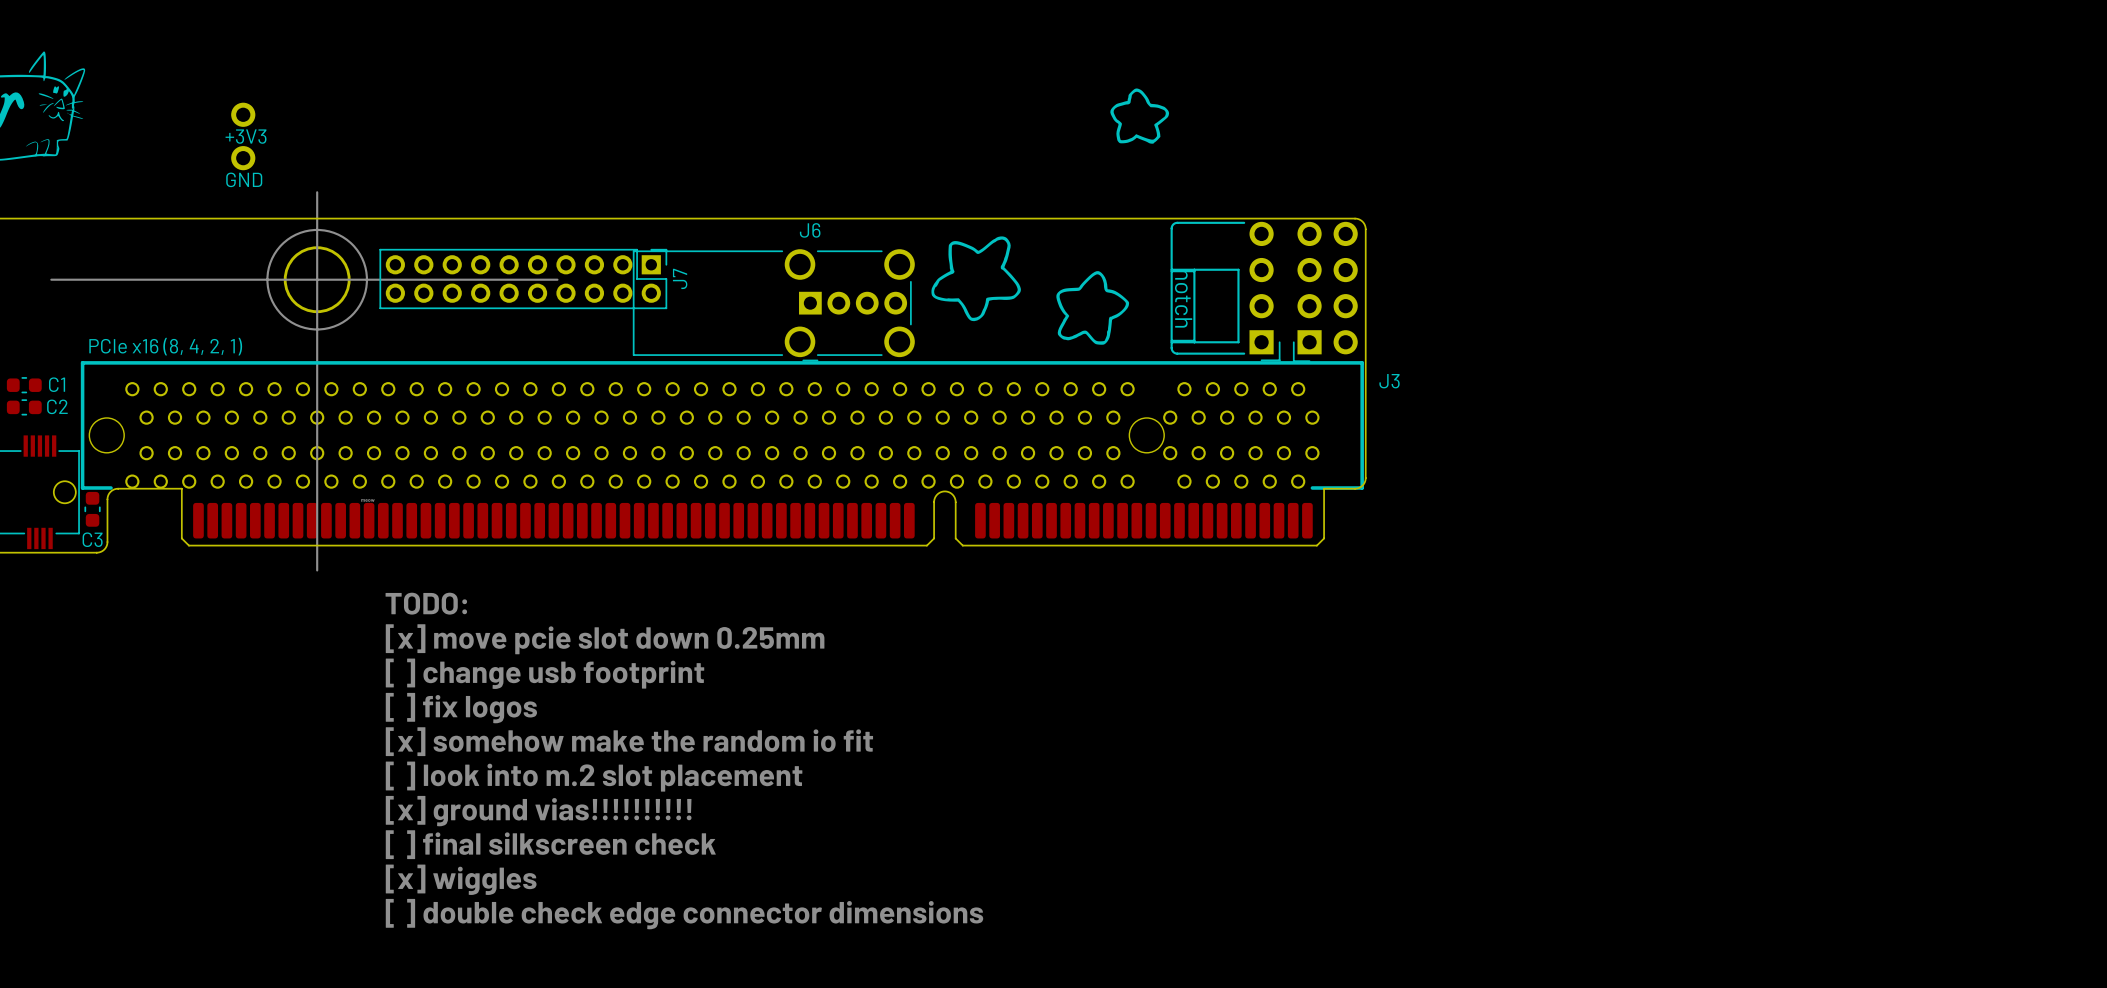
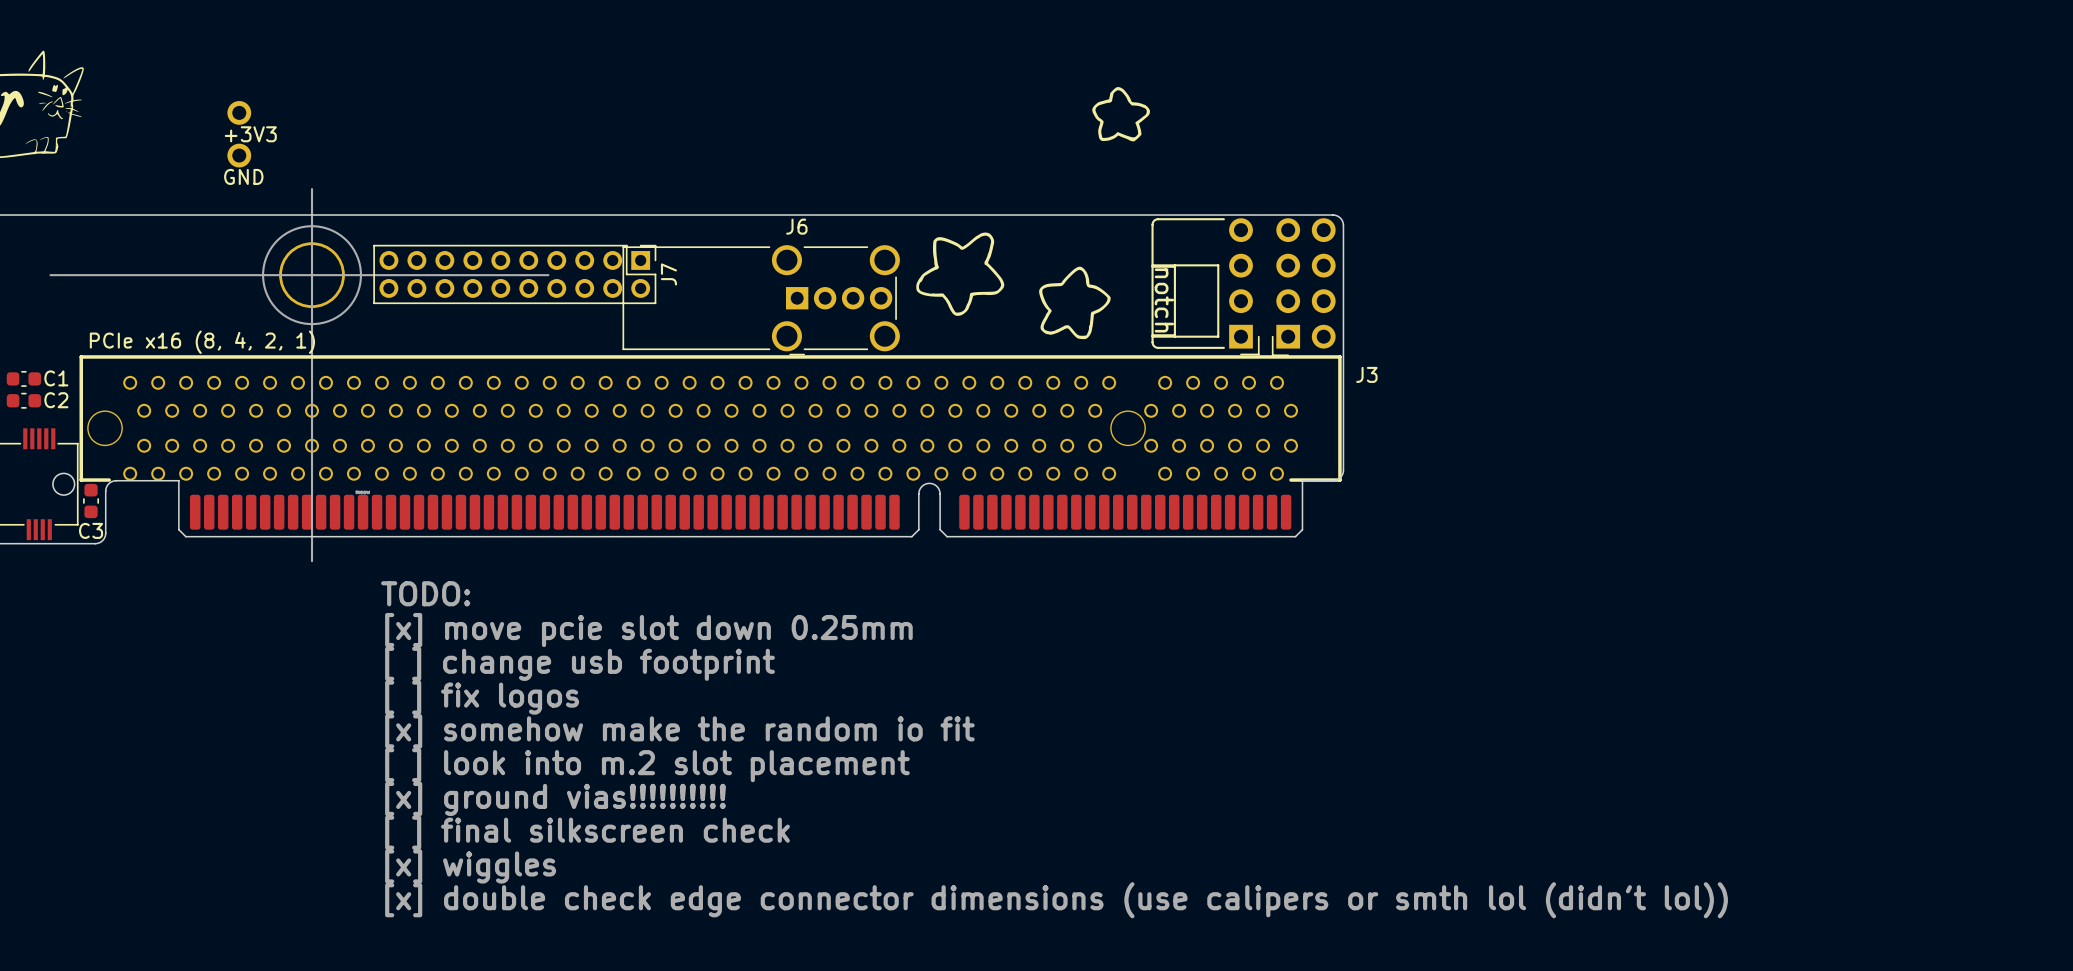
text: [ ] double check edge connector dimensions (684, 914) -> [x] double check edge connector dimensions (use calipers or smth lol (didn't lol)) (1056, 900)

